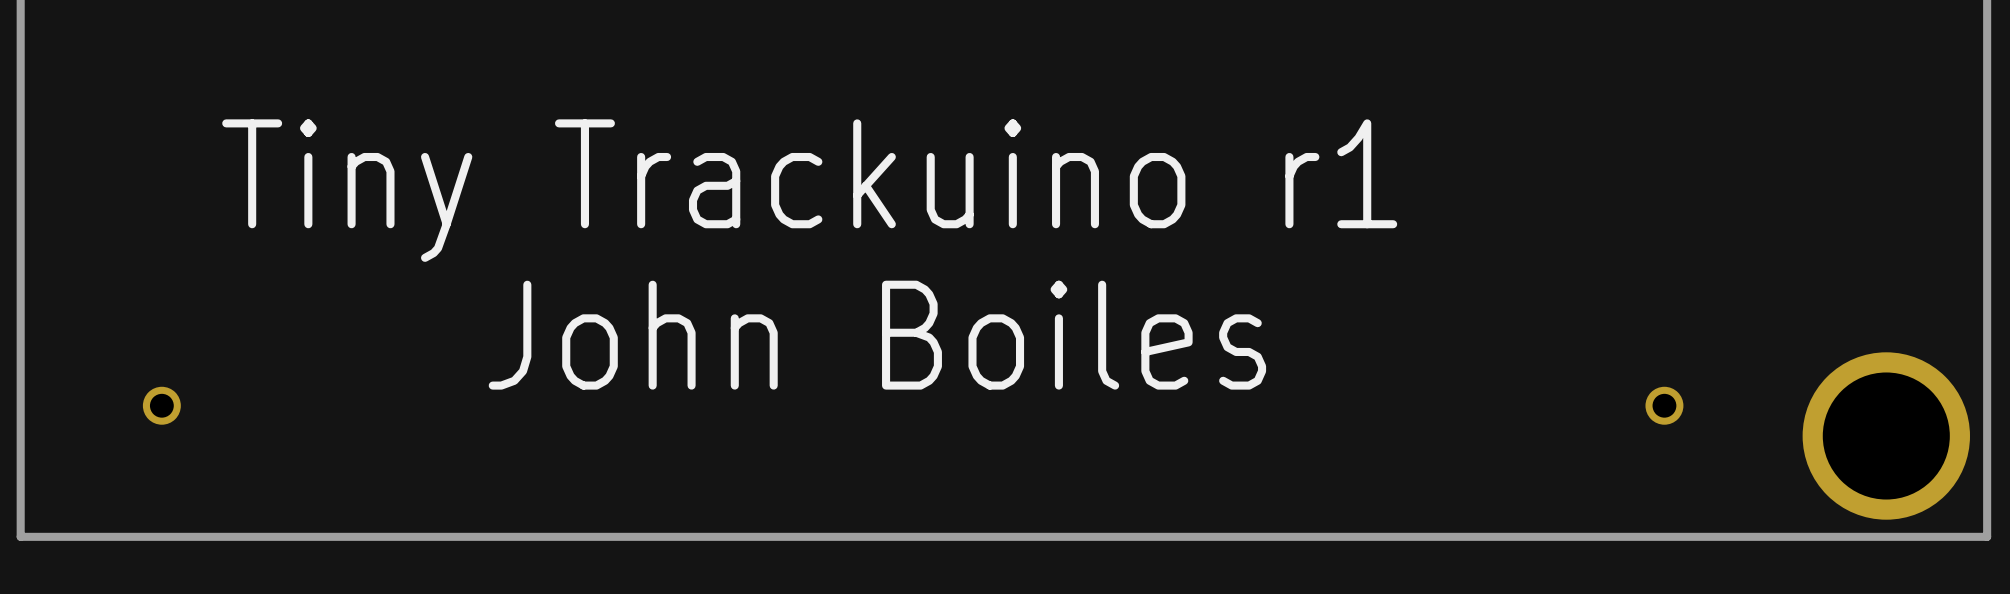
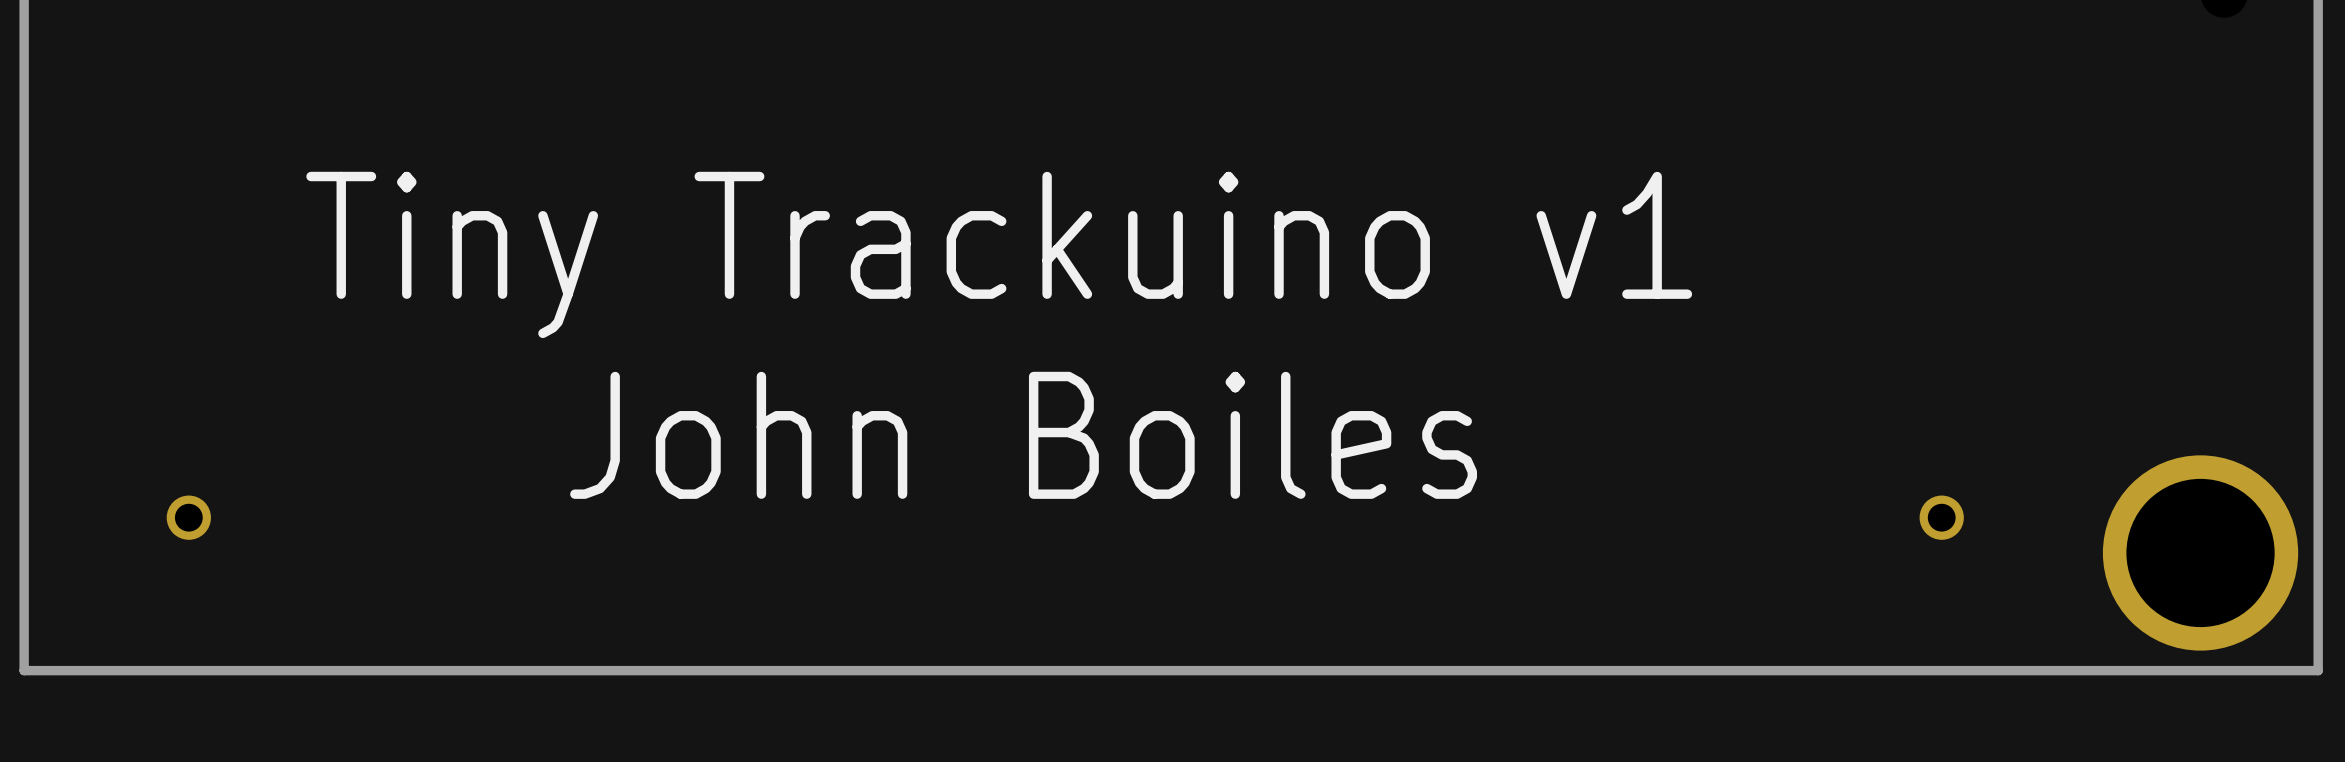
text: Tiny Trackuino r1 (809, 190) -> Tiny Trackuino v1 (999, 254)

